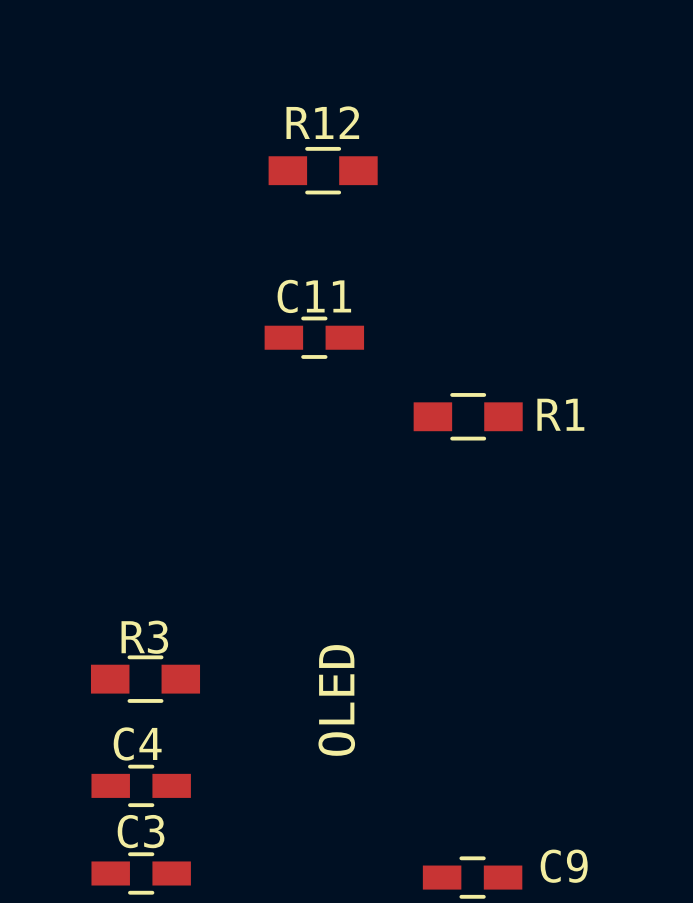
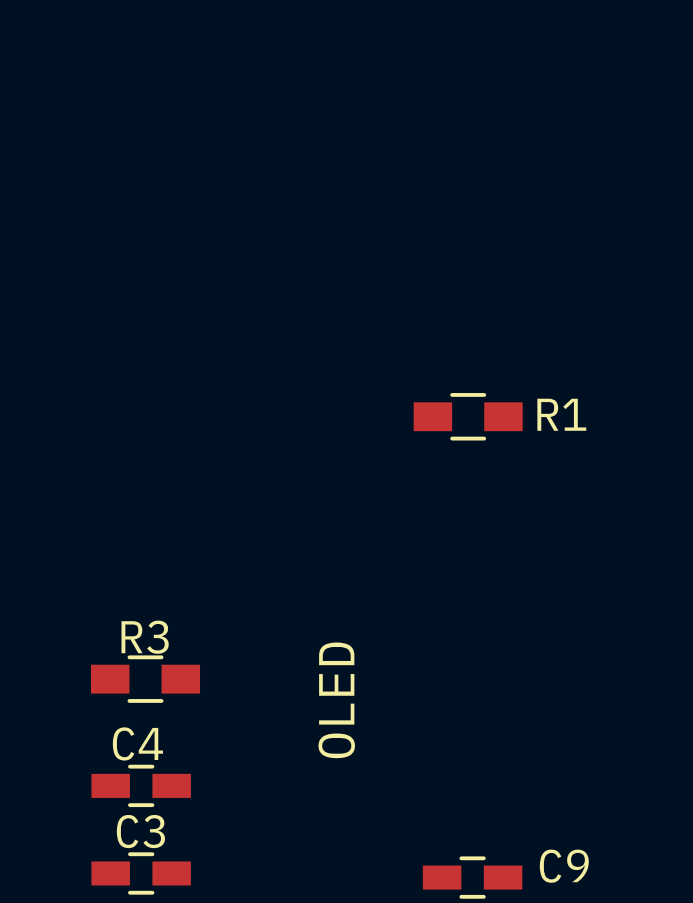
R12: (323, 170) -> none
C11: (314, 337) -> none

